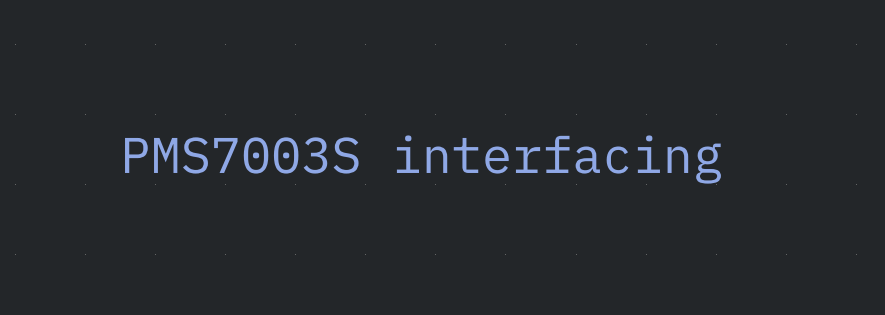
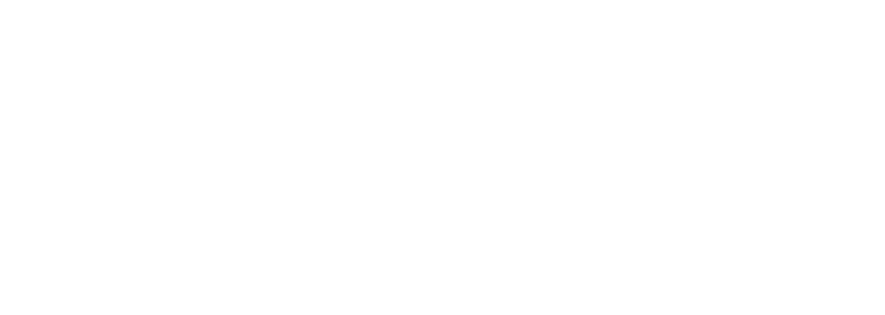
text: PMS7003S interfacing (422, 159) -> none

